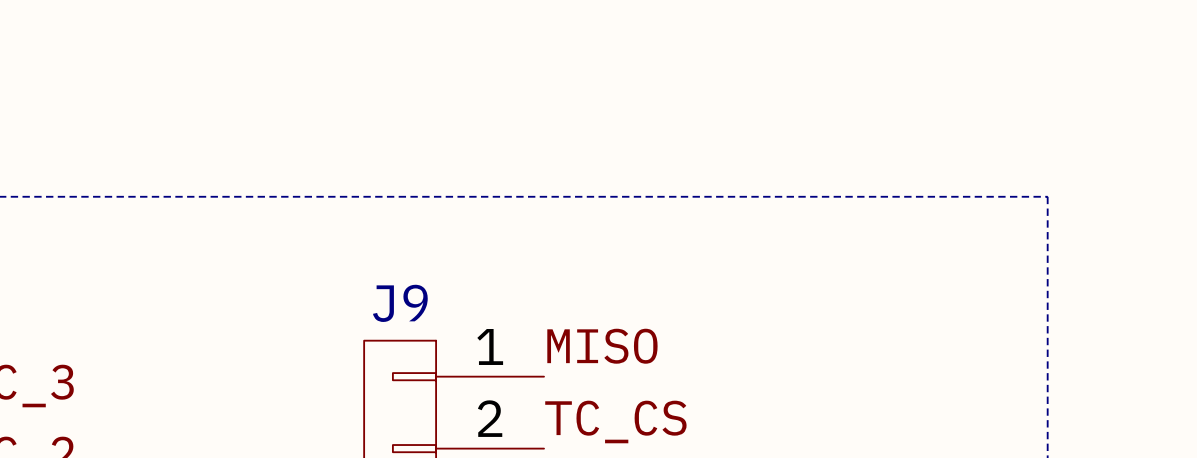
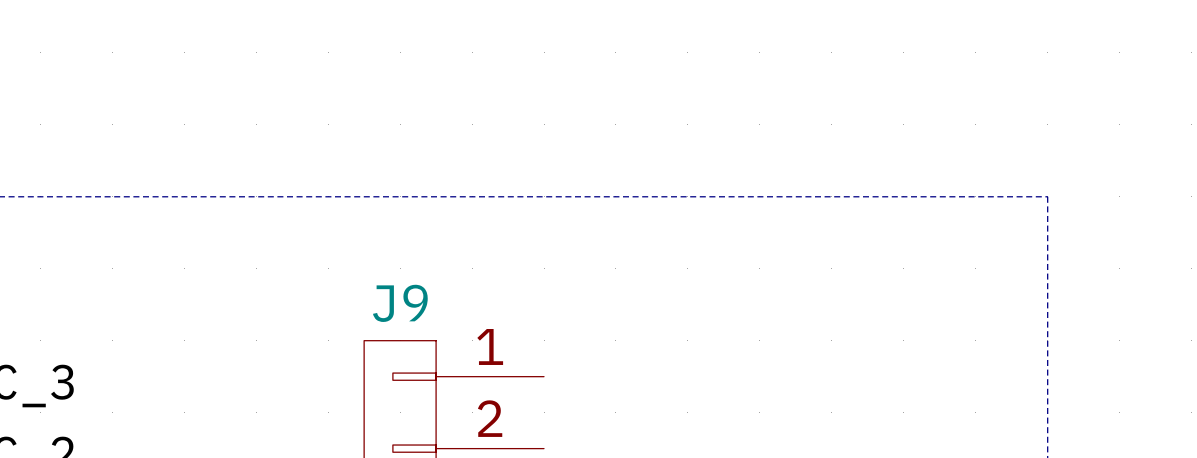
label: MISO (602, 346) -> none
label: TC_CS (615, 421) -> none

